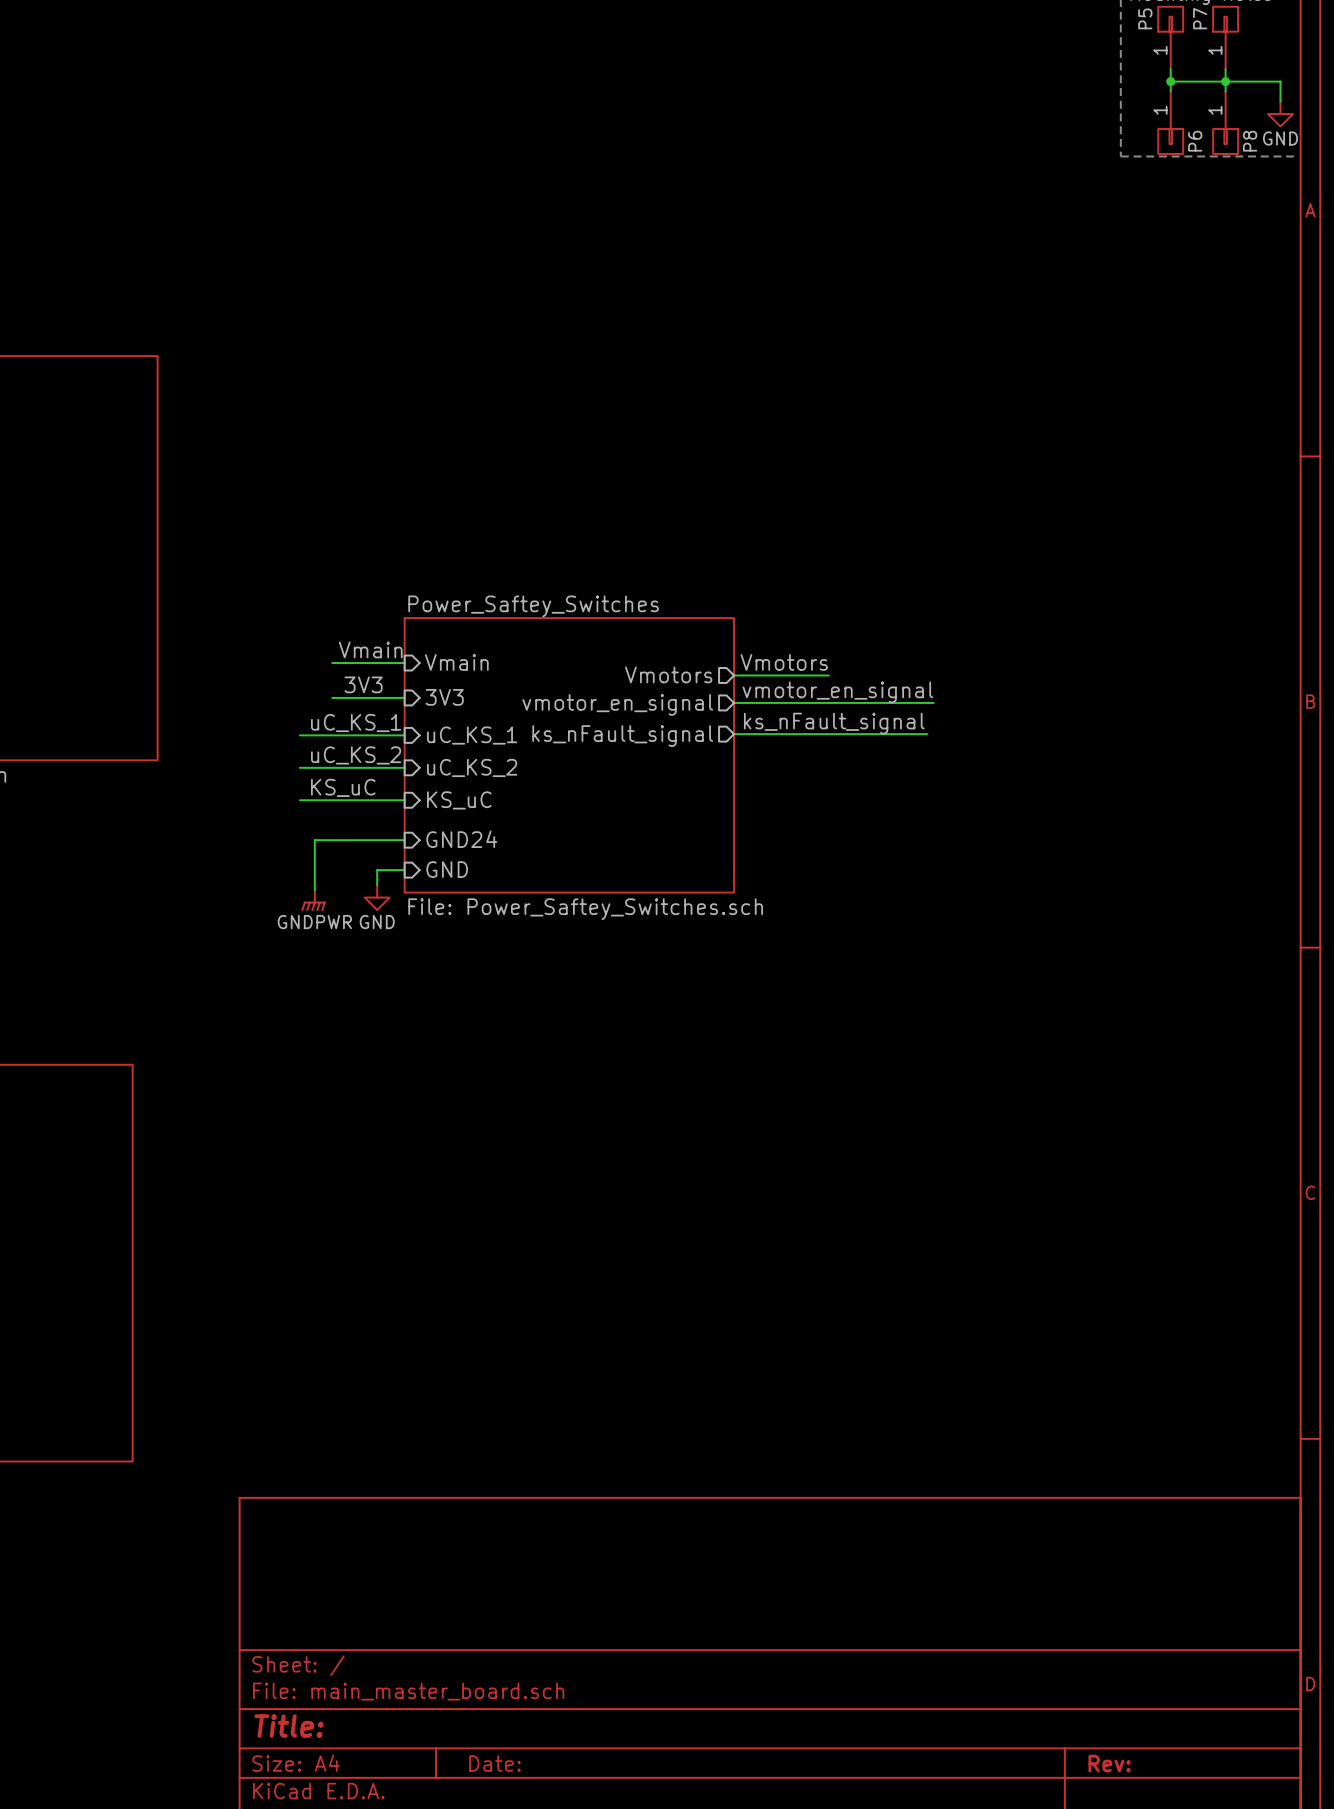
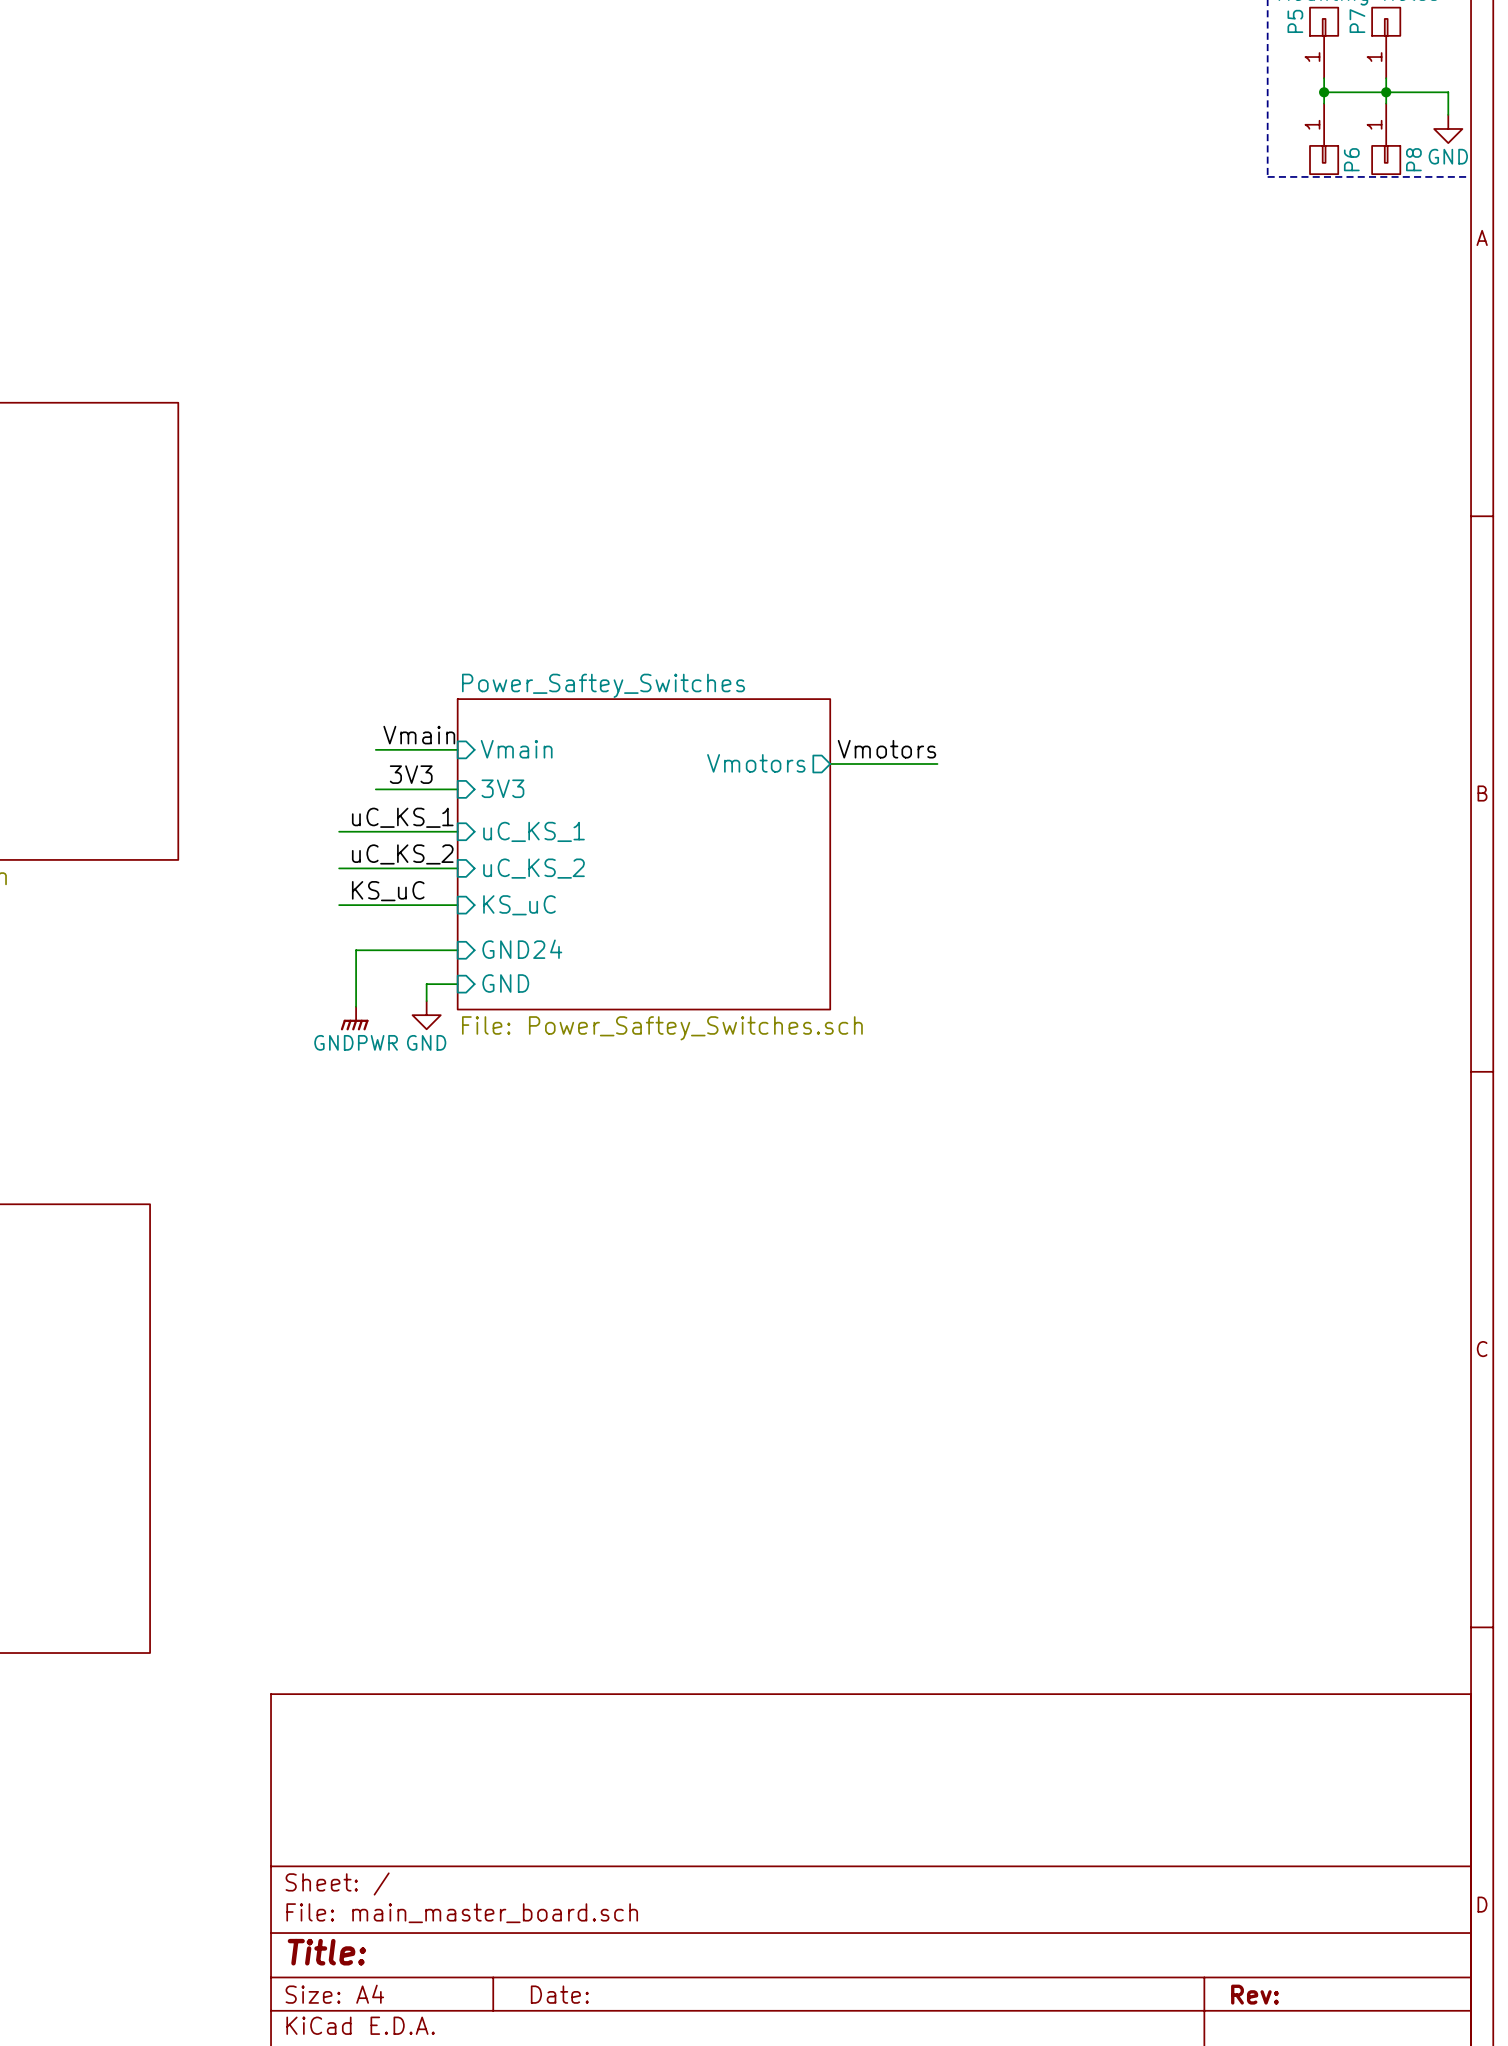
label: vmotor_en_signal (837, 692) -> none
wire: (734, 702) (933, 702) -> none
sheet pin: vmotor_en_signal (617, 704) -> none
label: ks_nFault_signal (834, 723) -> none
wire: (734, 734) (927, 734) -> none
sheet pin: ks_nFault_signal (622, 736) -> none

